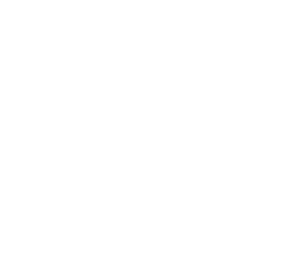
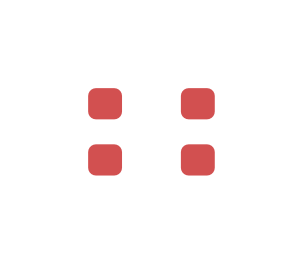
part: none -> (105, 131)
part: none -> (197, 131)

